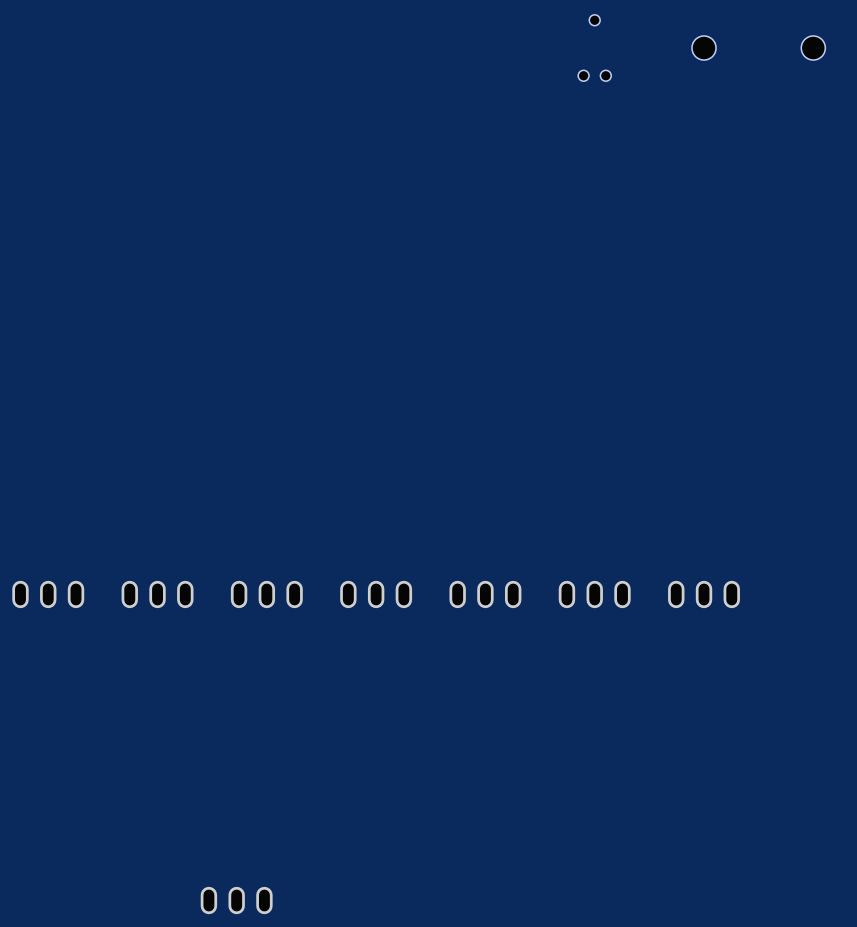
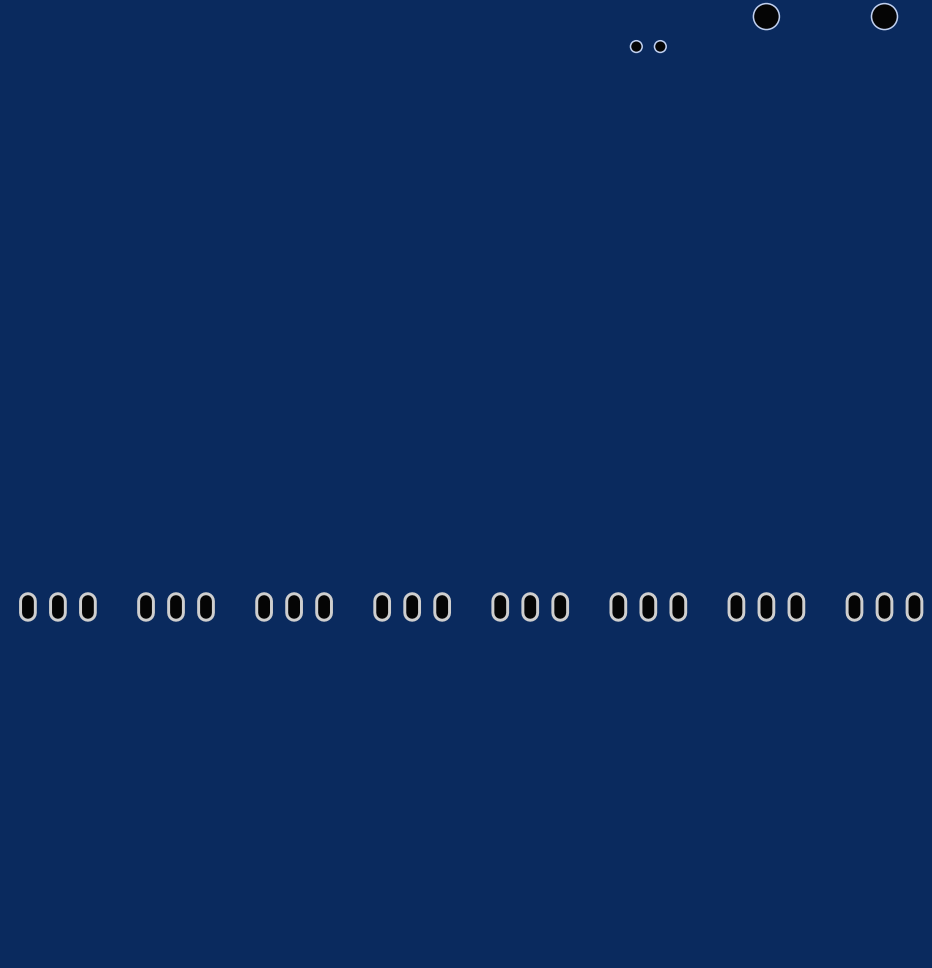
part: none -> (884, 606)
part: (236, 900) -> none

